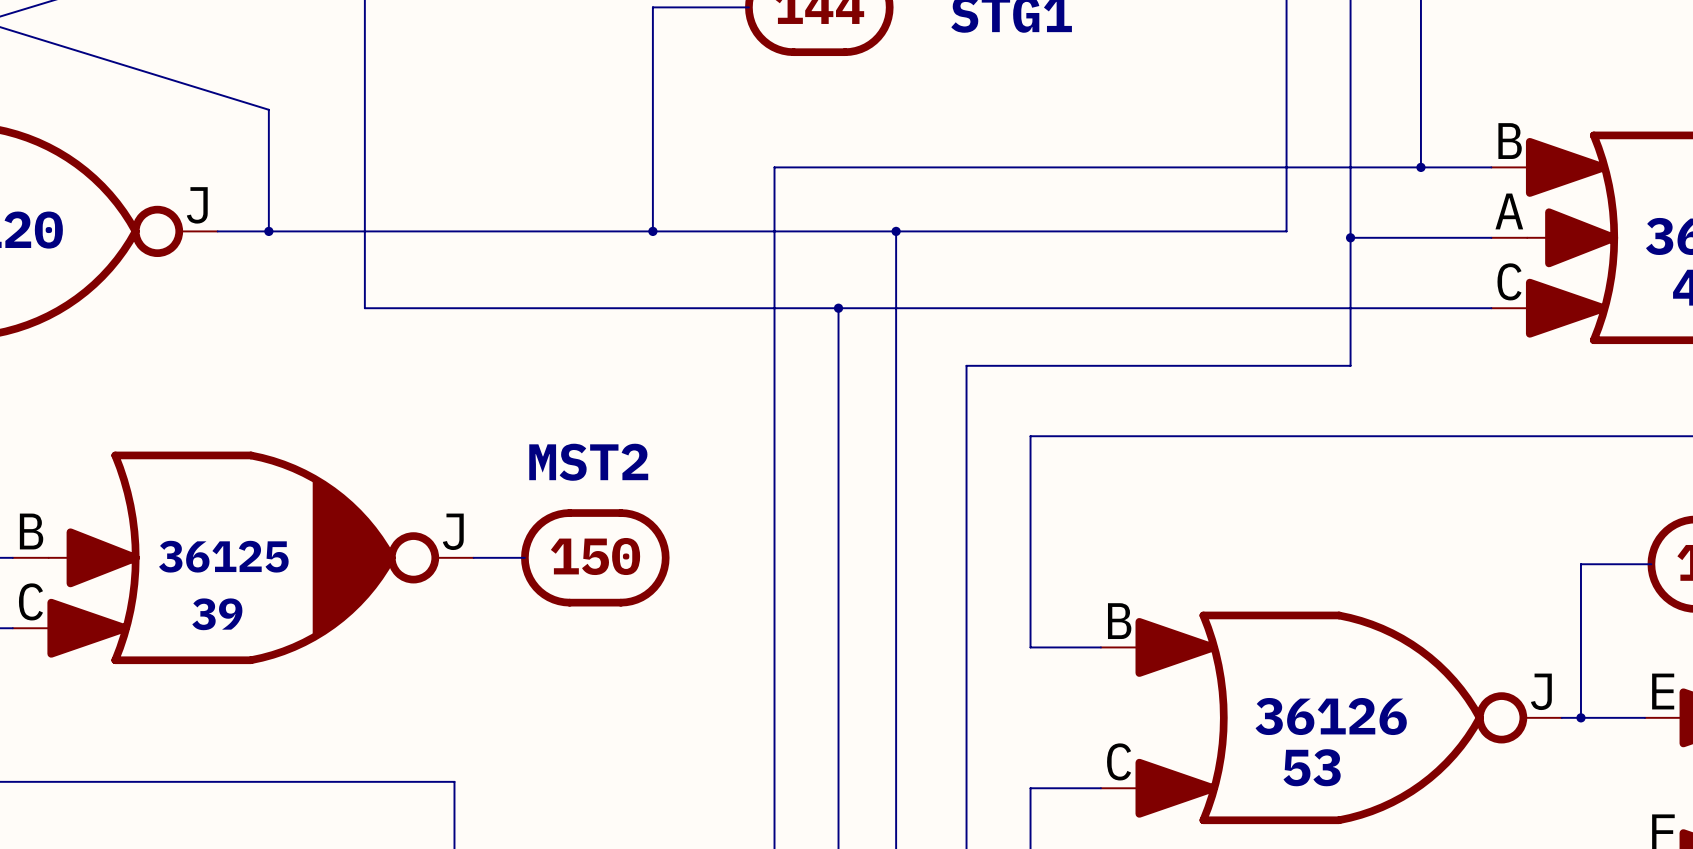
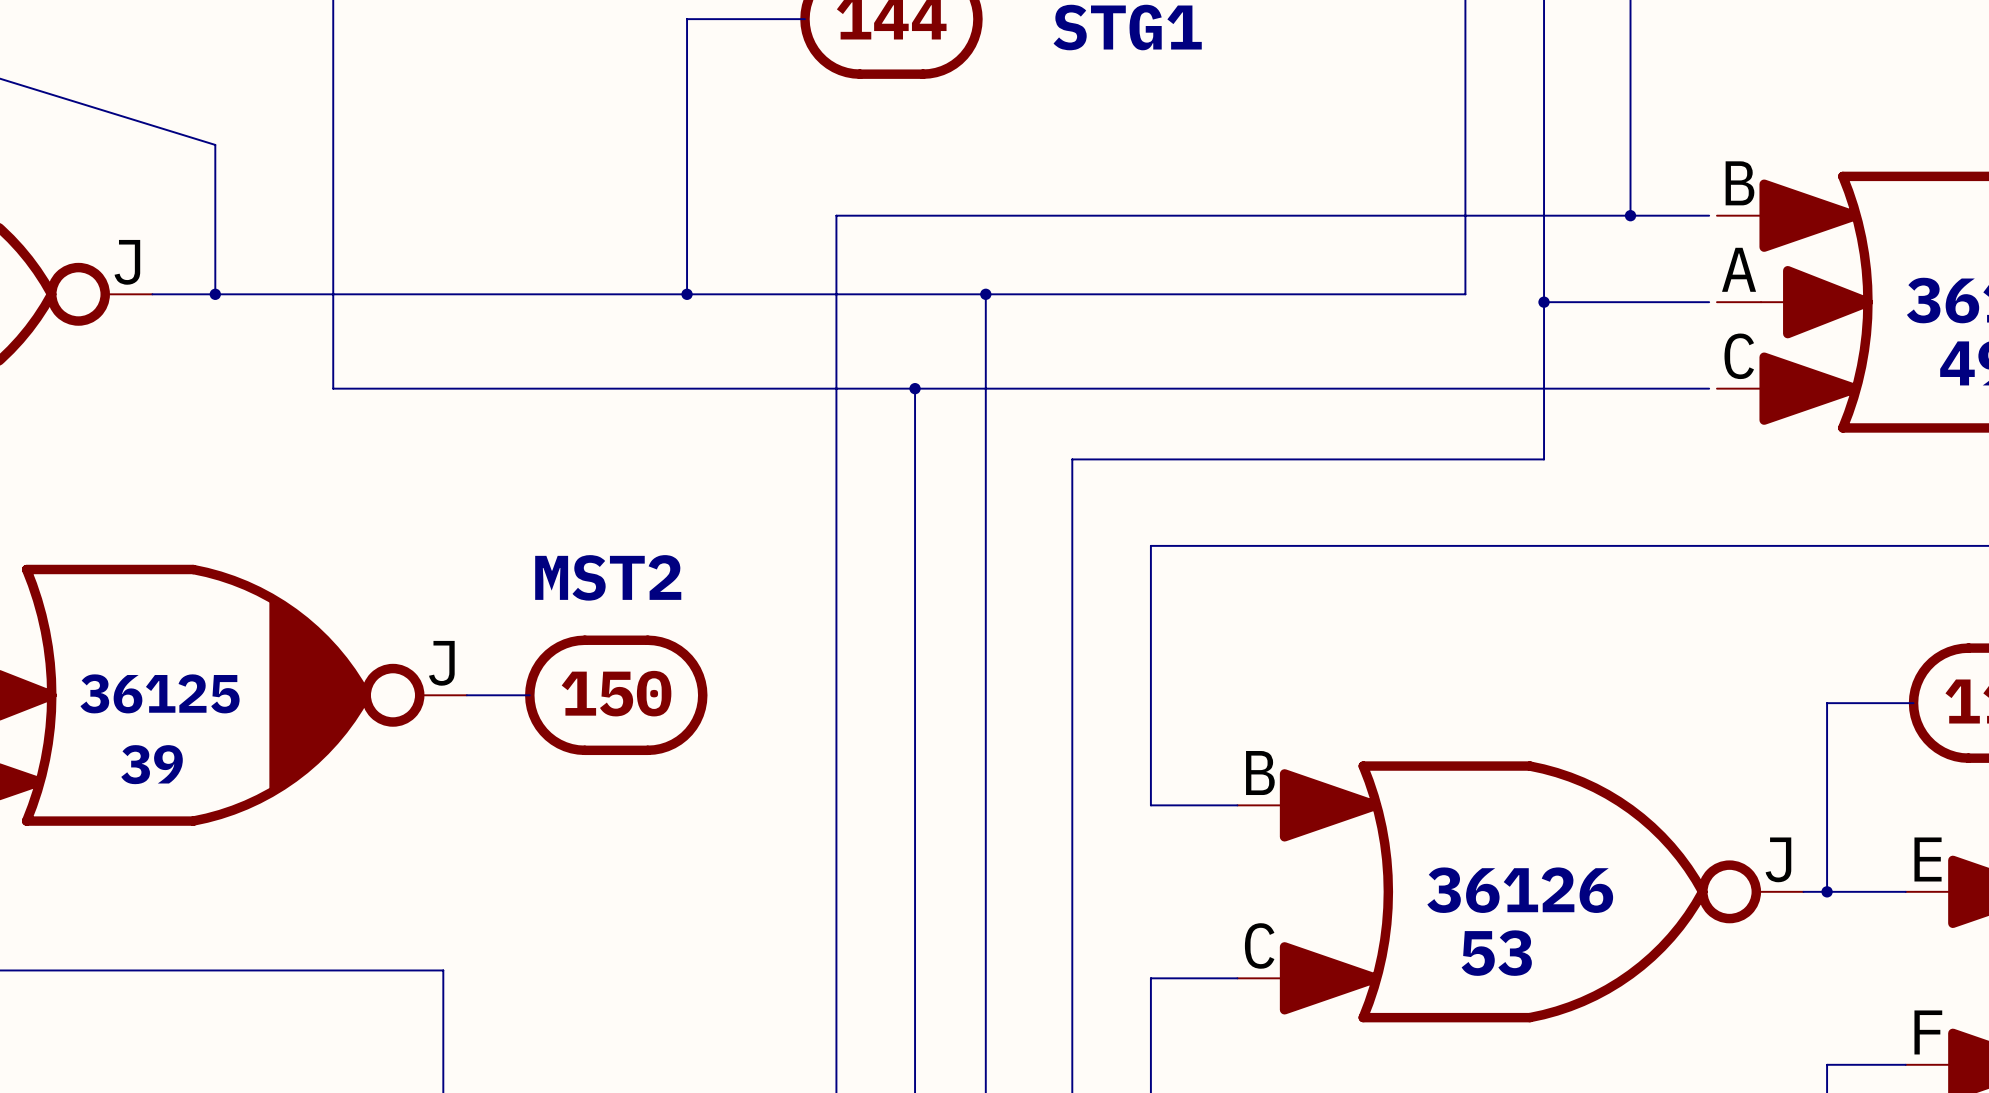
wire: (1484, 167) (1491, 167) -> none
wire: (1484, 237) (1491, 237) -> none
wire: (1484, 308) (1491, 308) -> none

